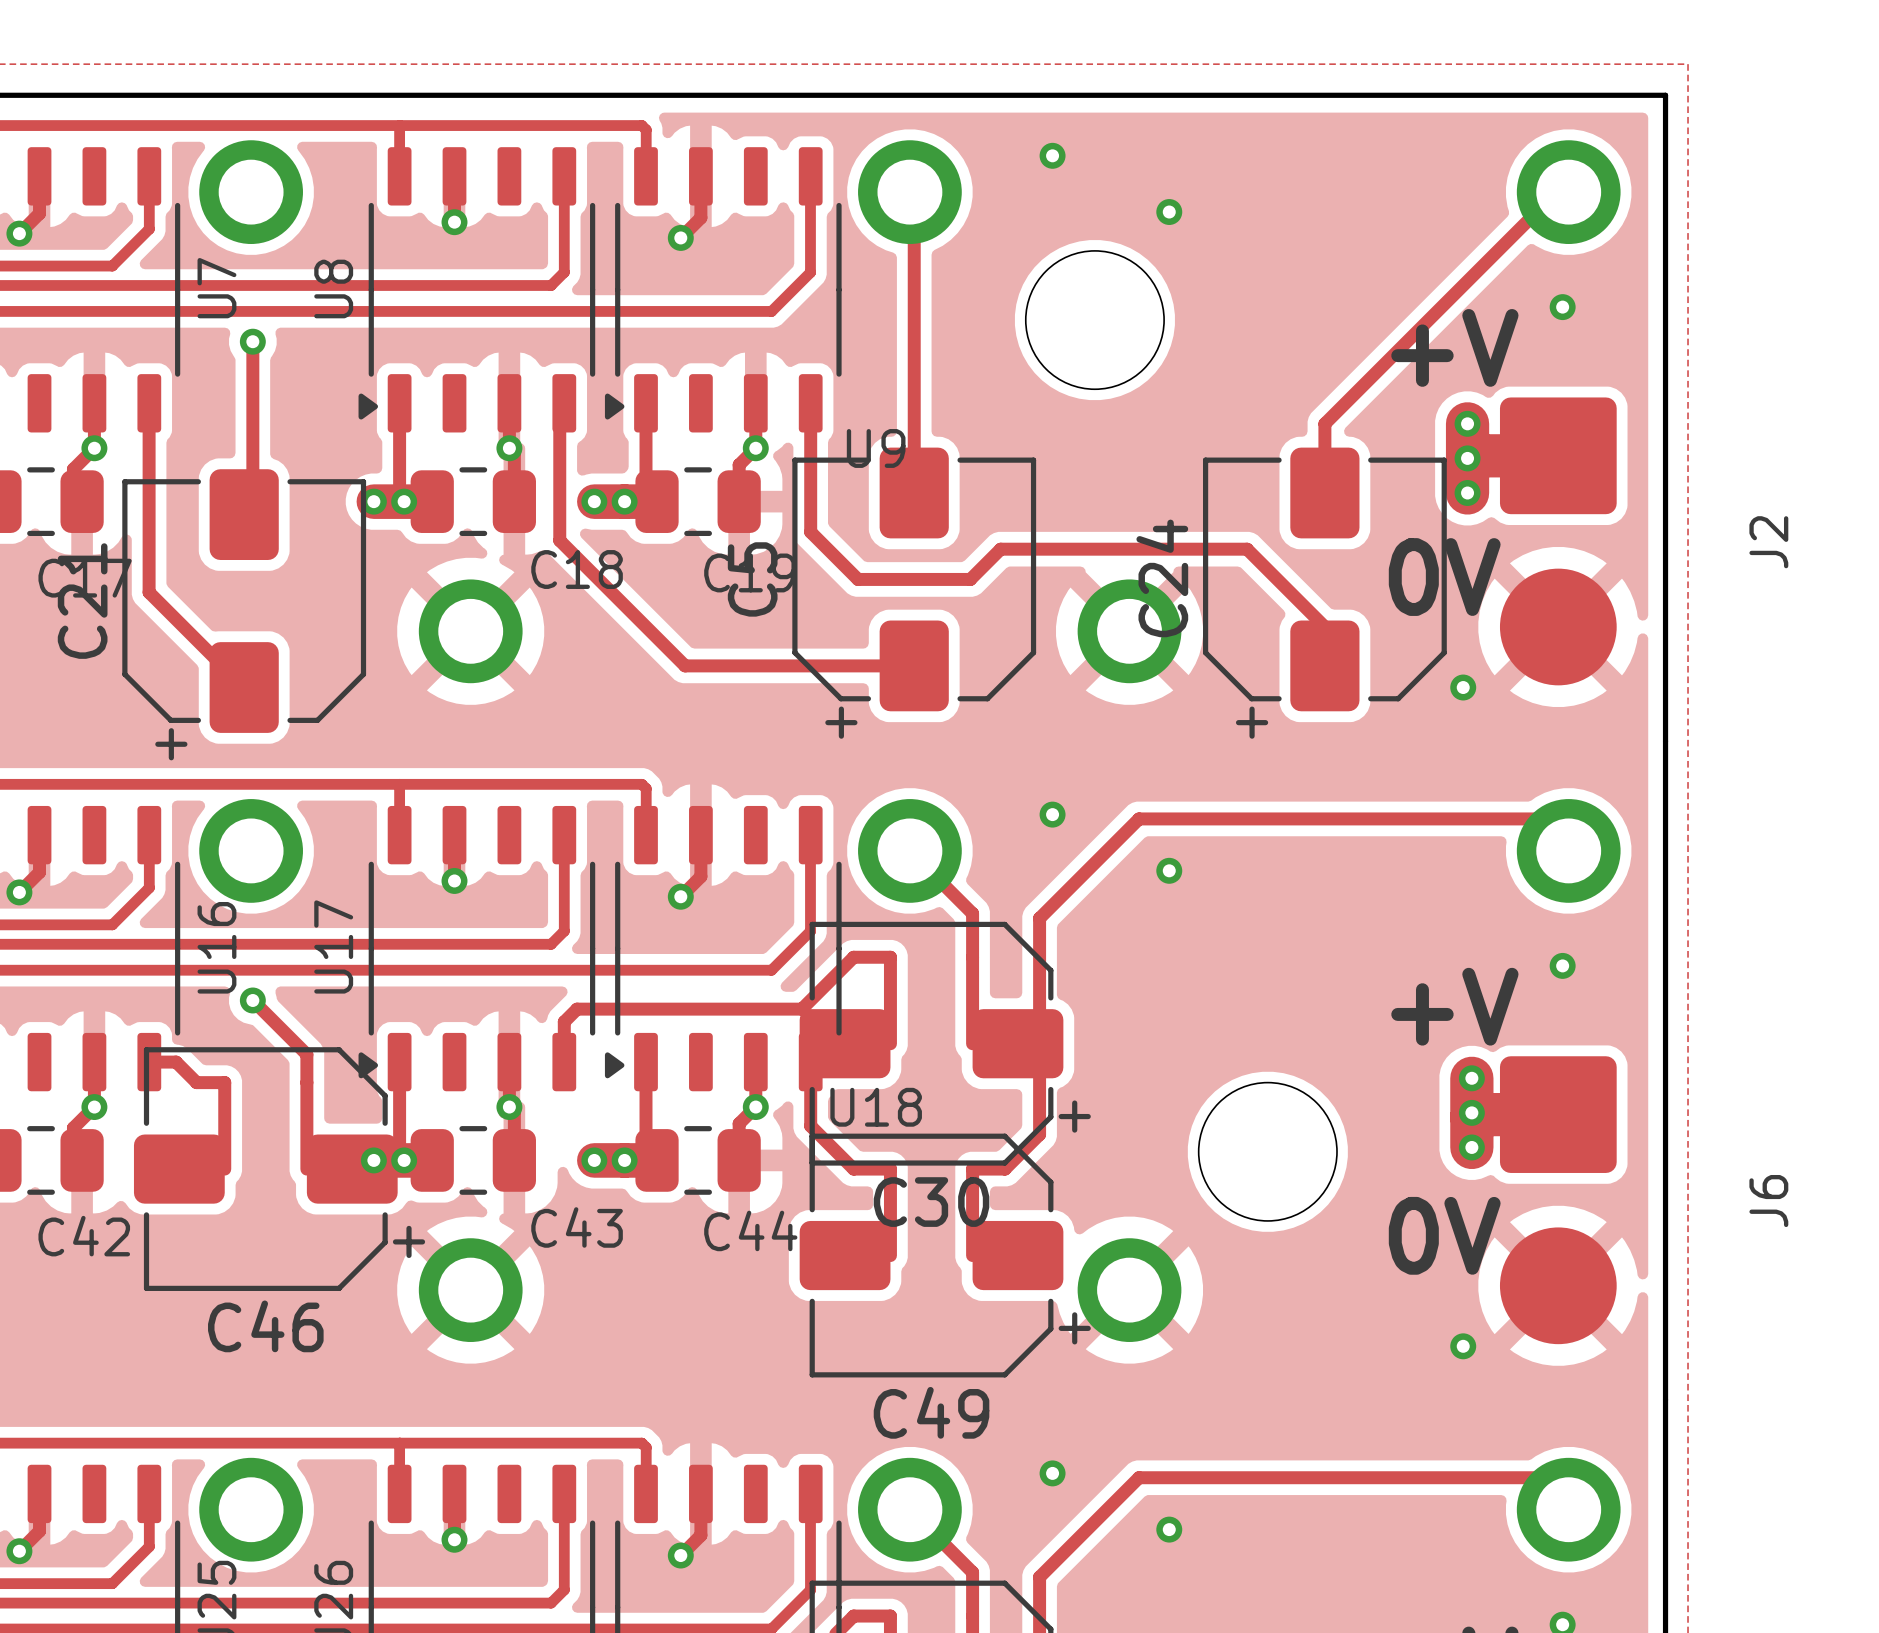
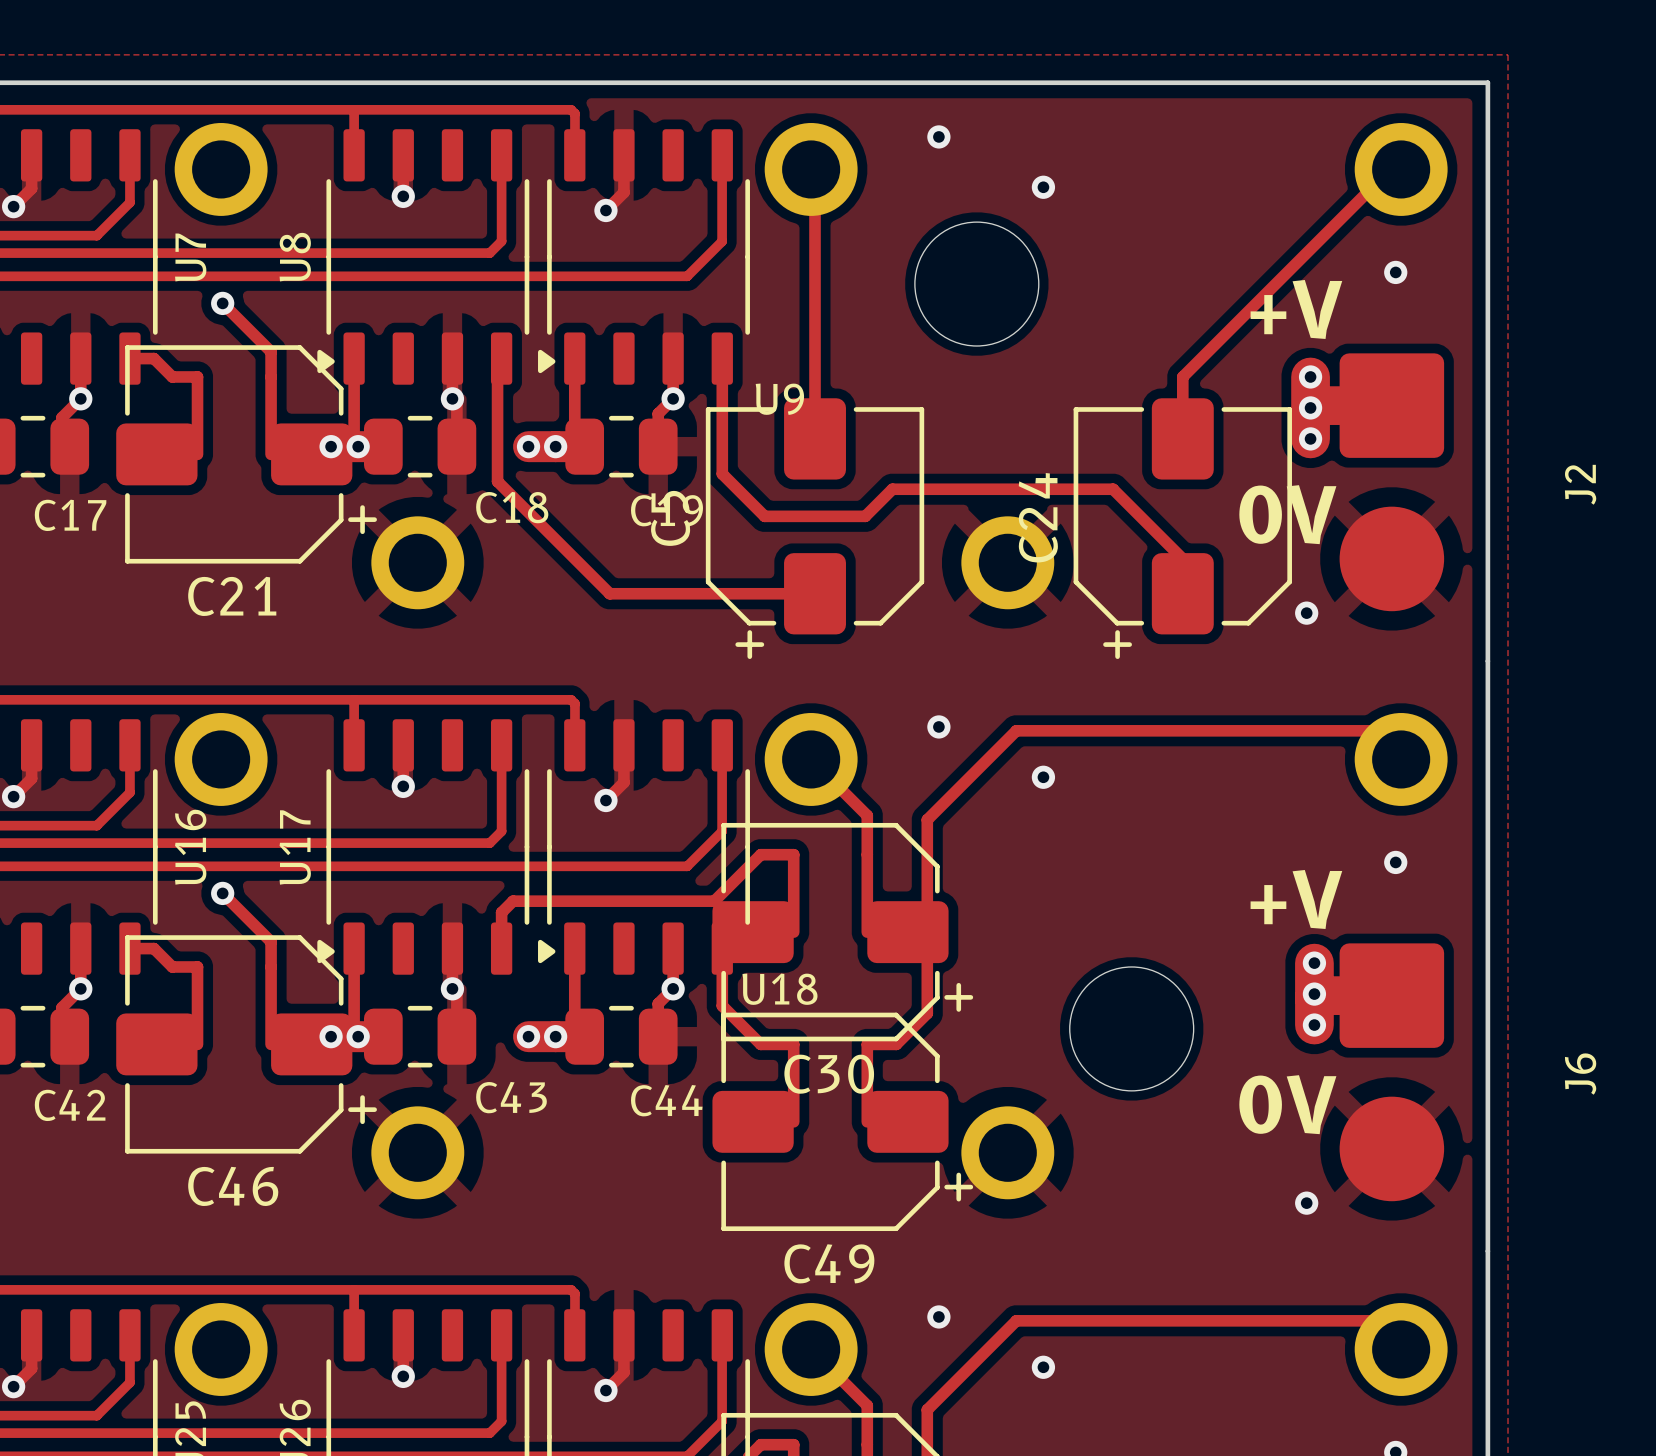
track: (252, 341) (252, 505) (244, 514) -> (222, 303) (271, 351) (271, 454)
track: (149, 403) (149, 592) (244, 687) -> (129, 358) (153, 358) (172, 376) (197, 376) (197, 454)
C21 rotation: 0° (244, 614) -> 90° counterclockwise (246, 454)

